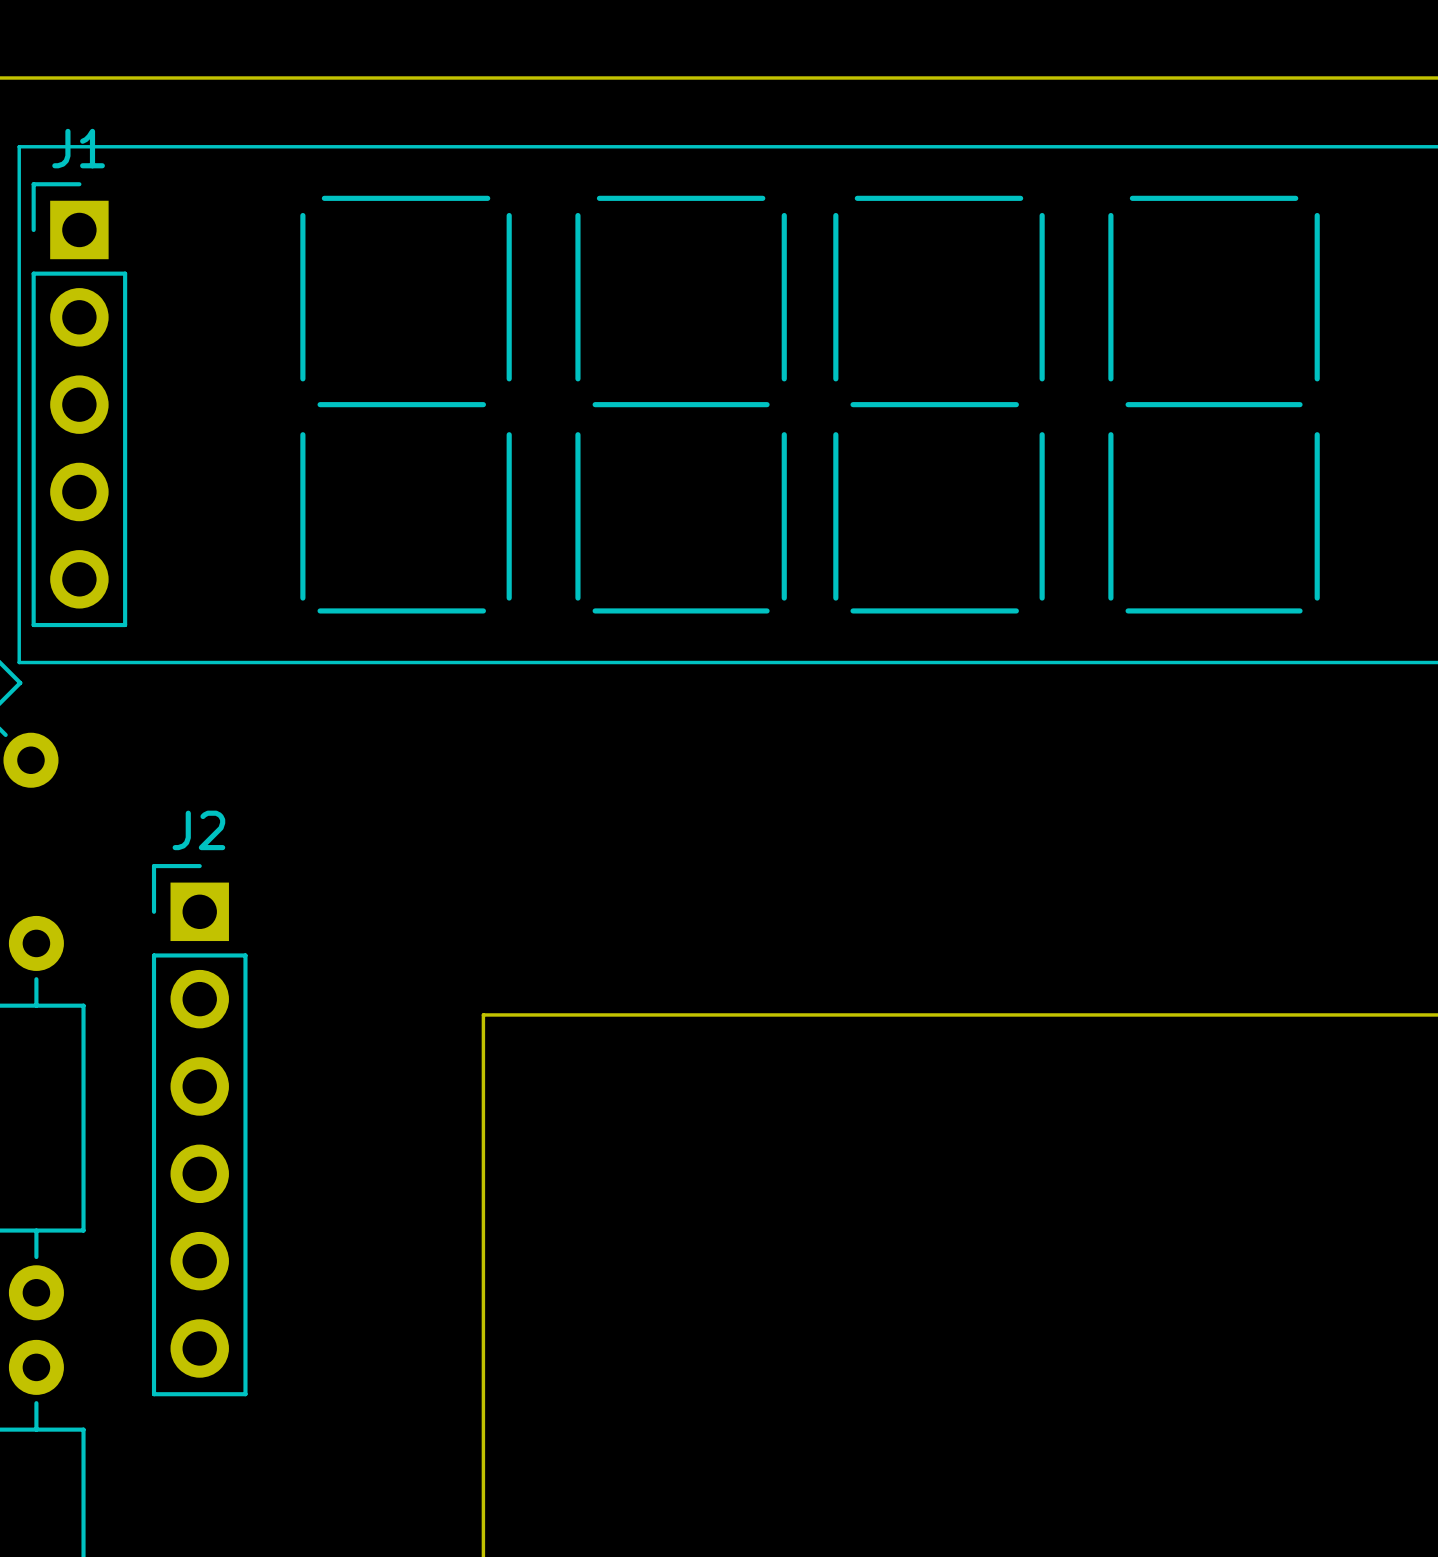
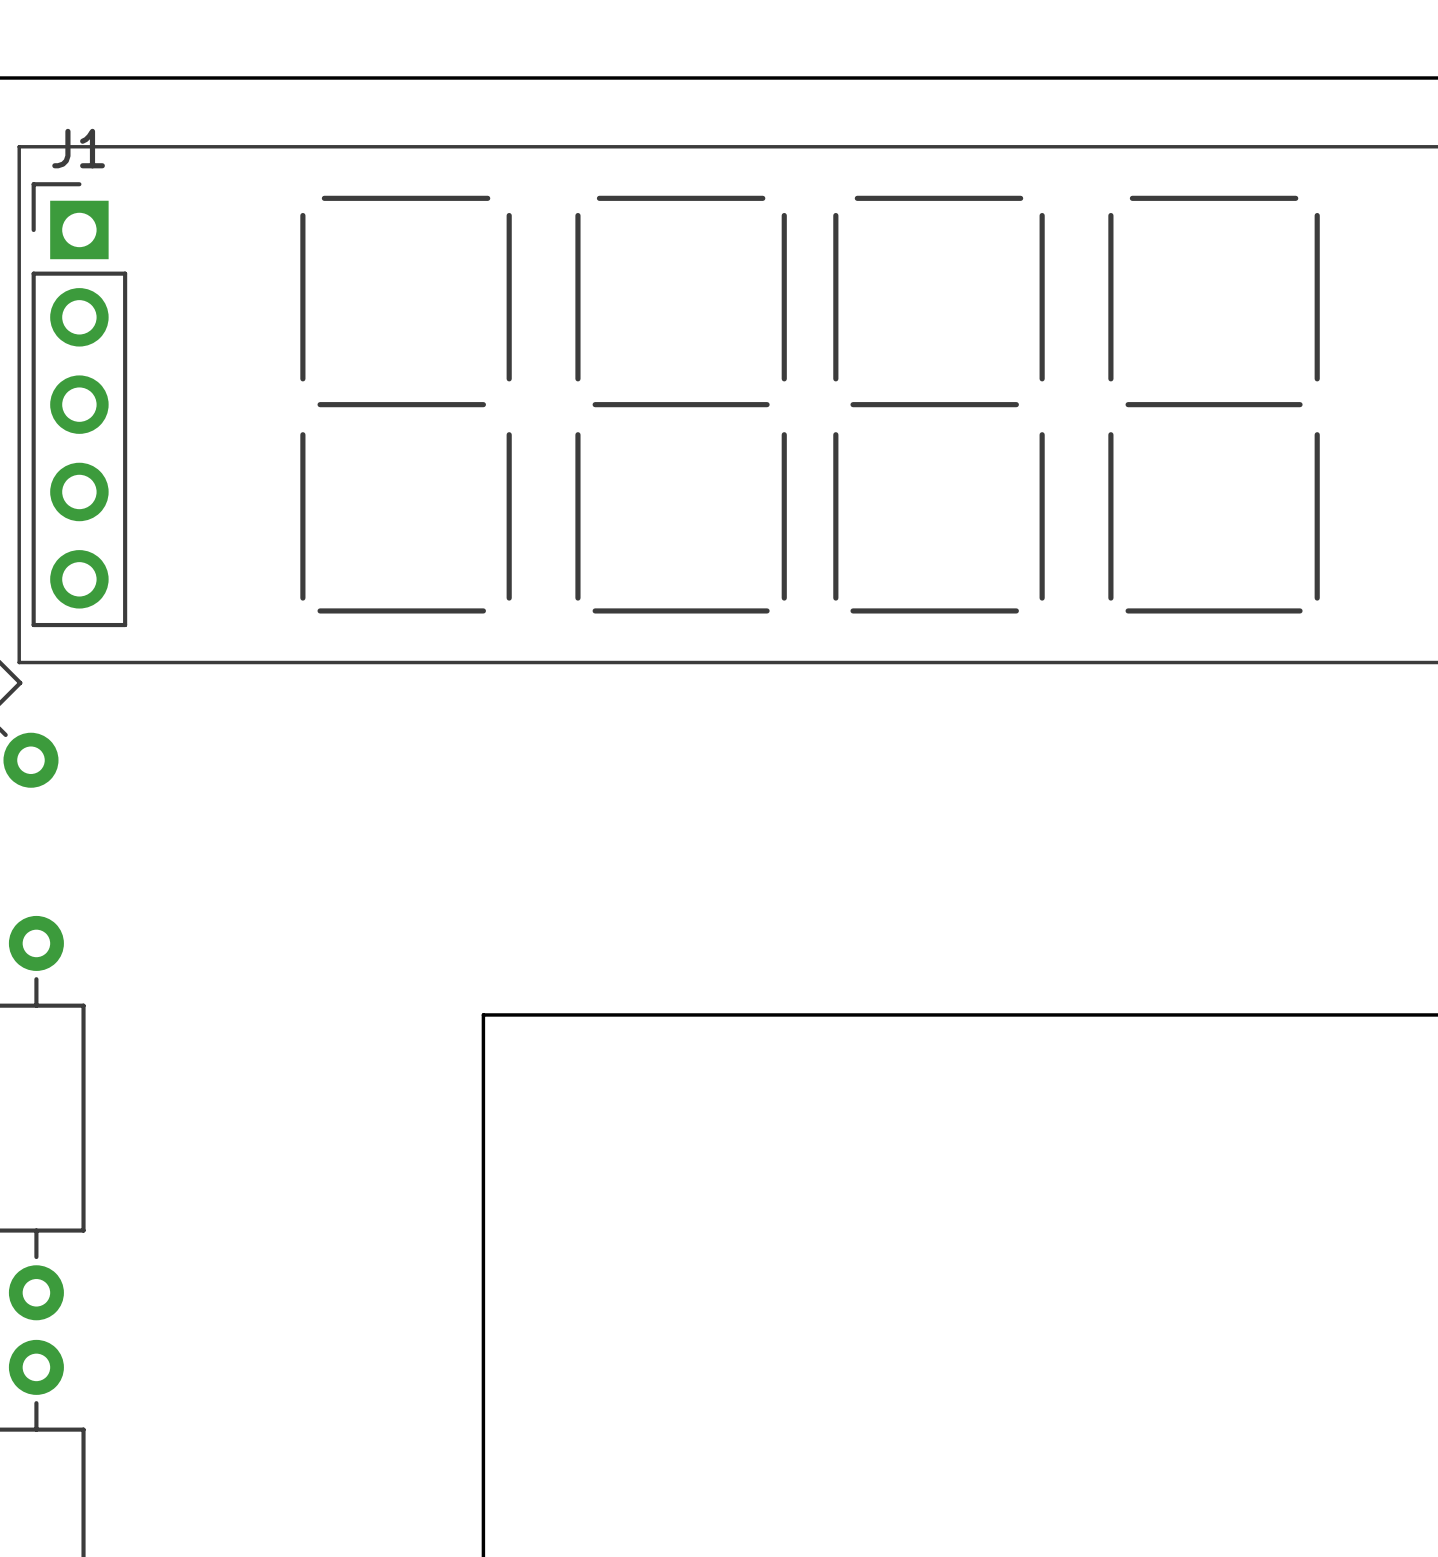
J2: (199, 1130) -> none

